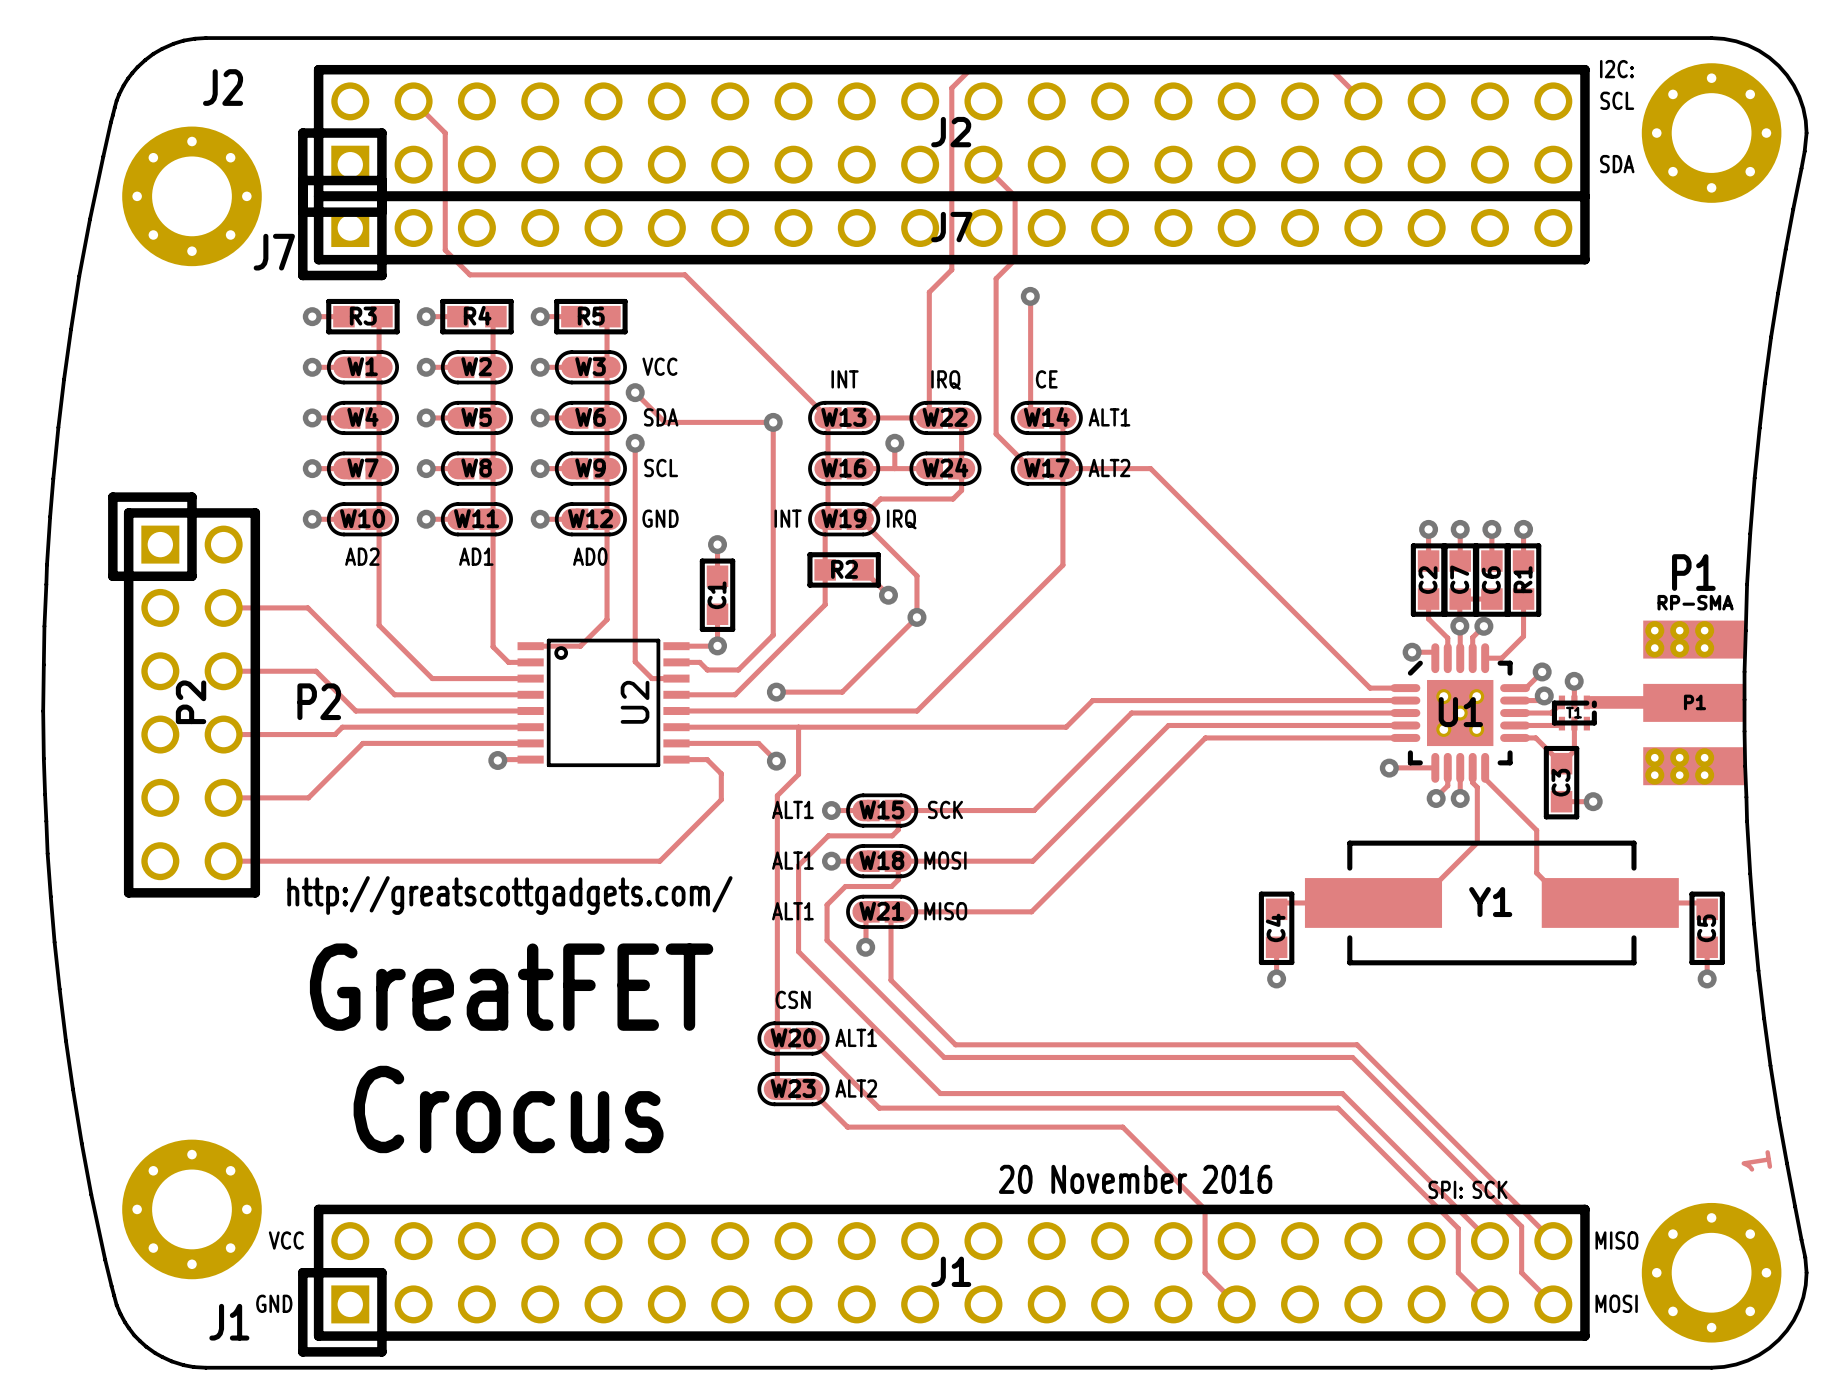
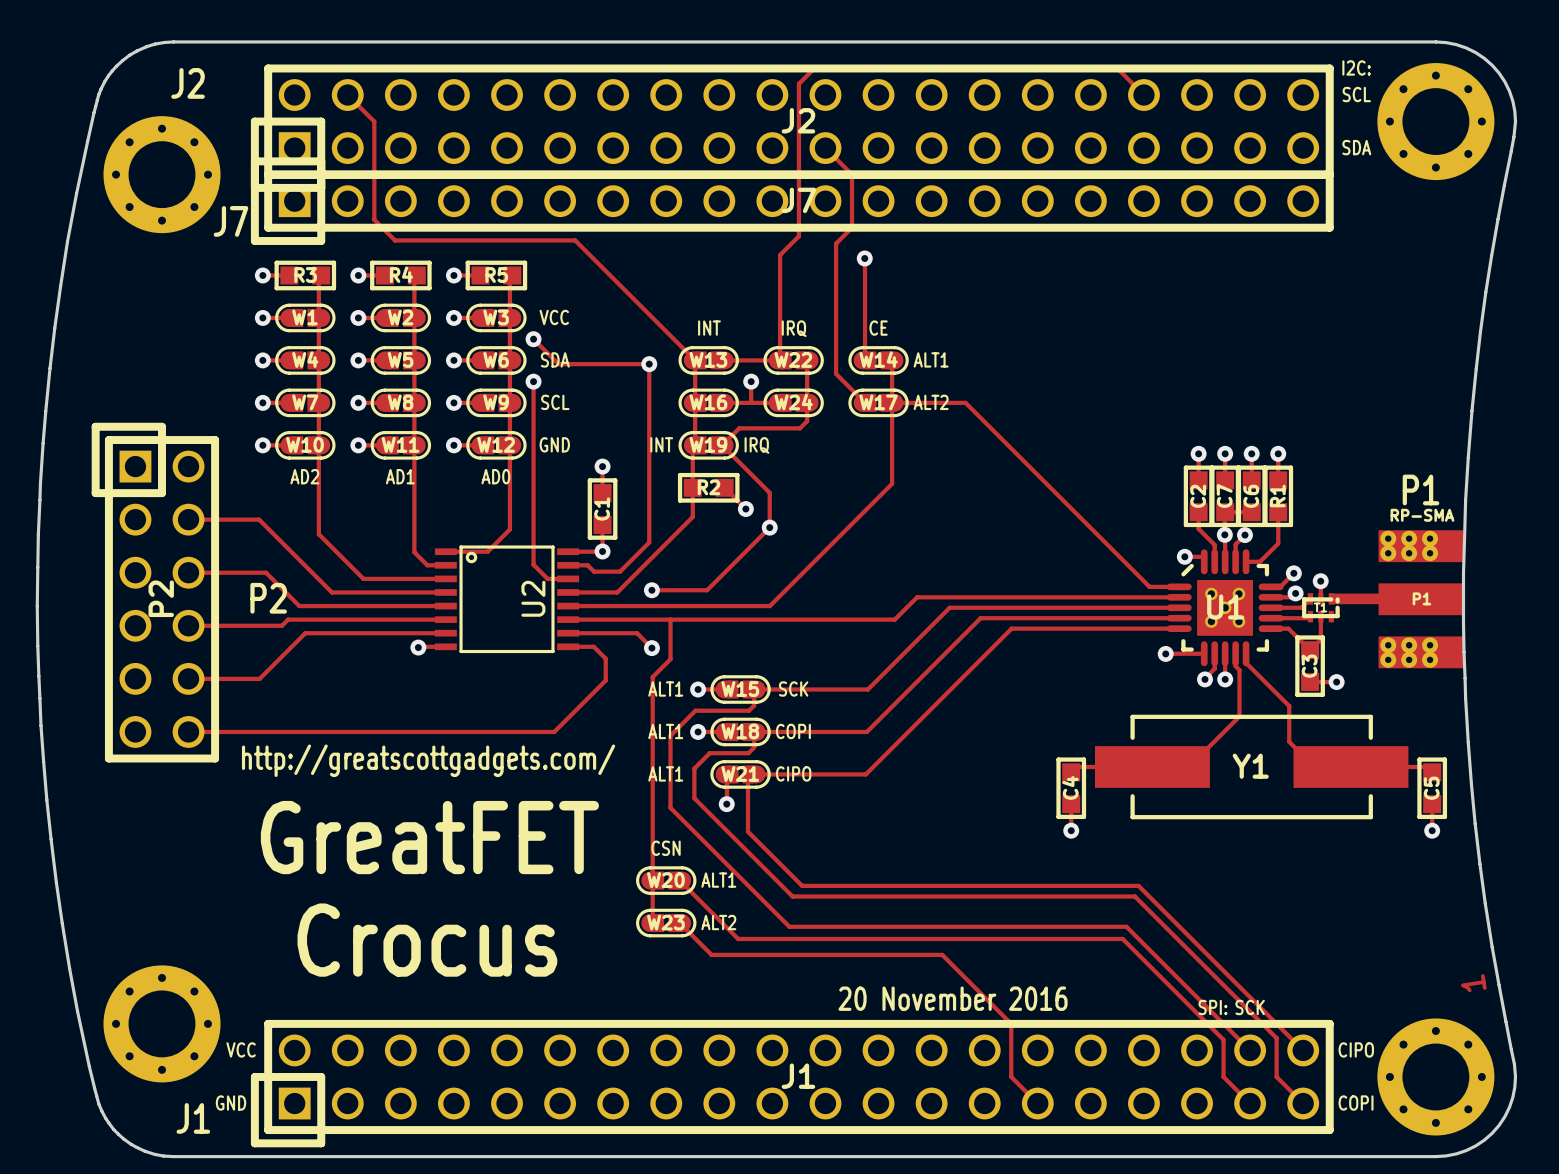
text: MOSI (945, 860) -> COPI (793, 731)
text: MISO (945, 911) -> CIPO (793, 773)
text: MISO (1616, 1240) -> CIPO (1356, 1049)
text: MOSI (1616, 1303) -> COPI (1356, 1103)

